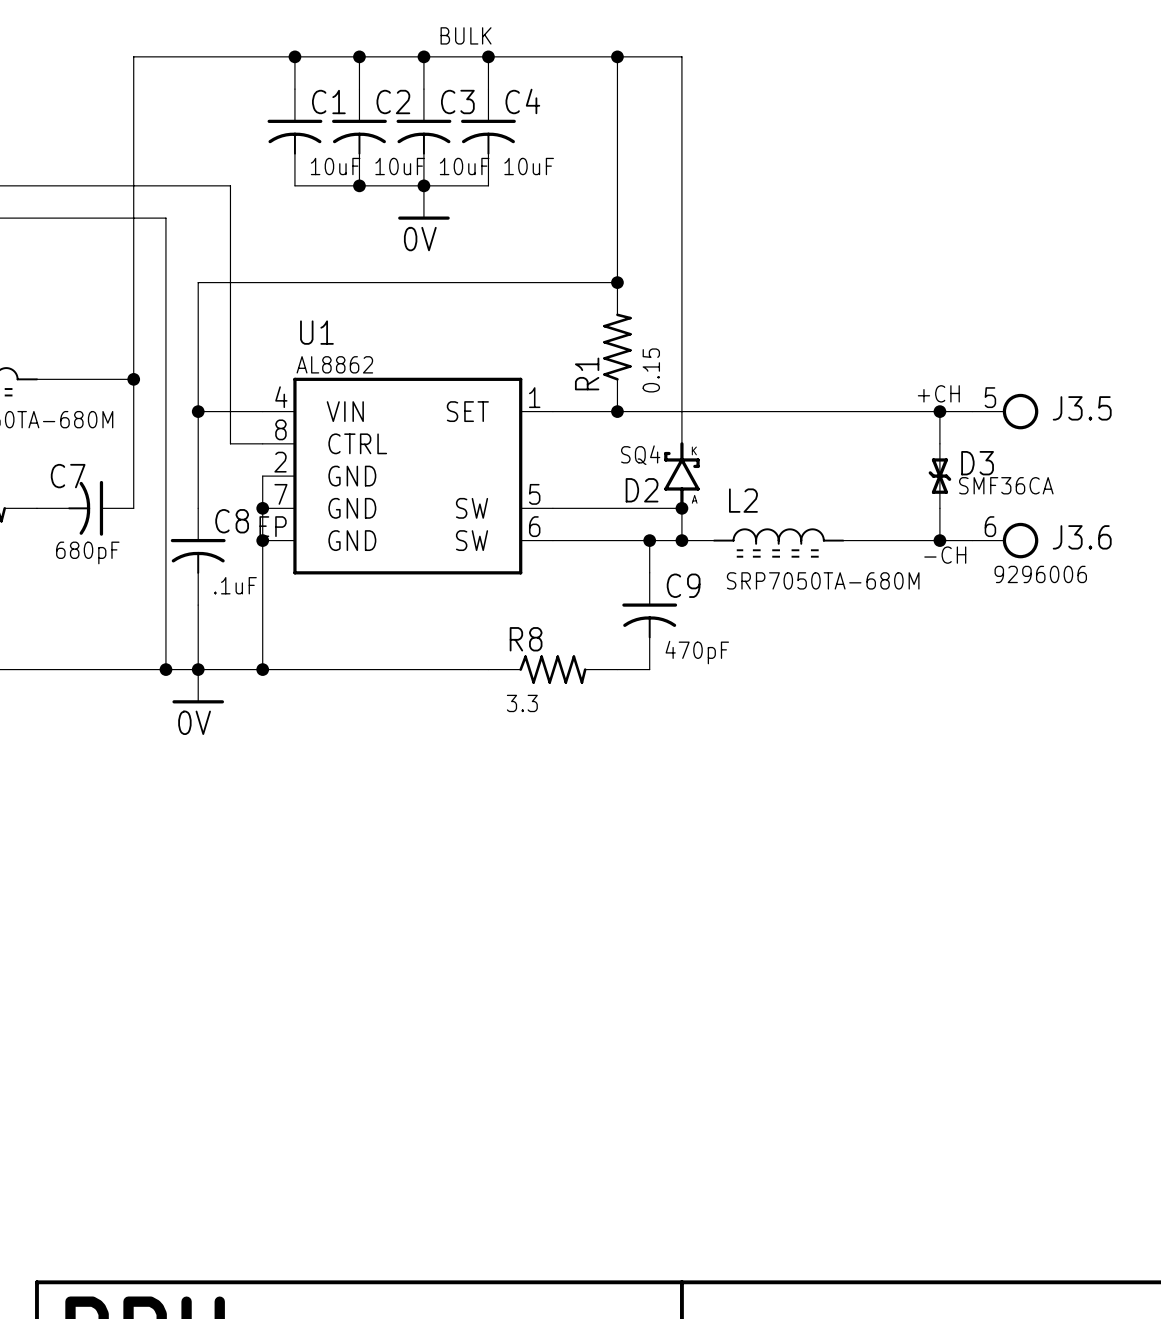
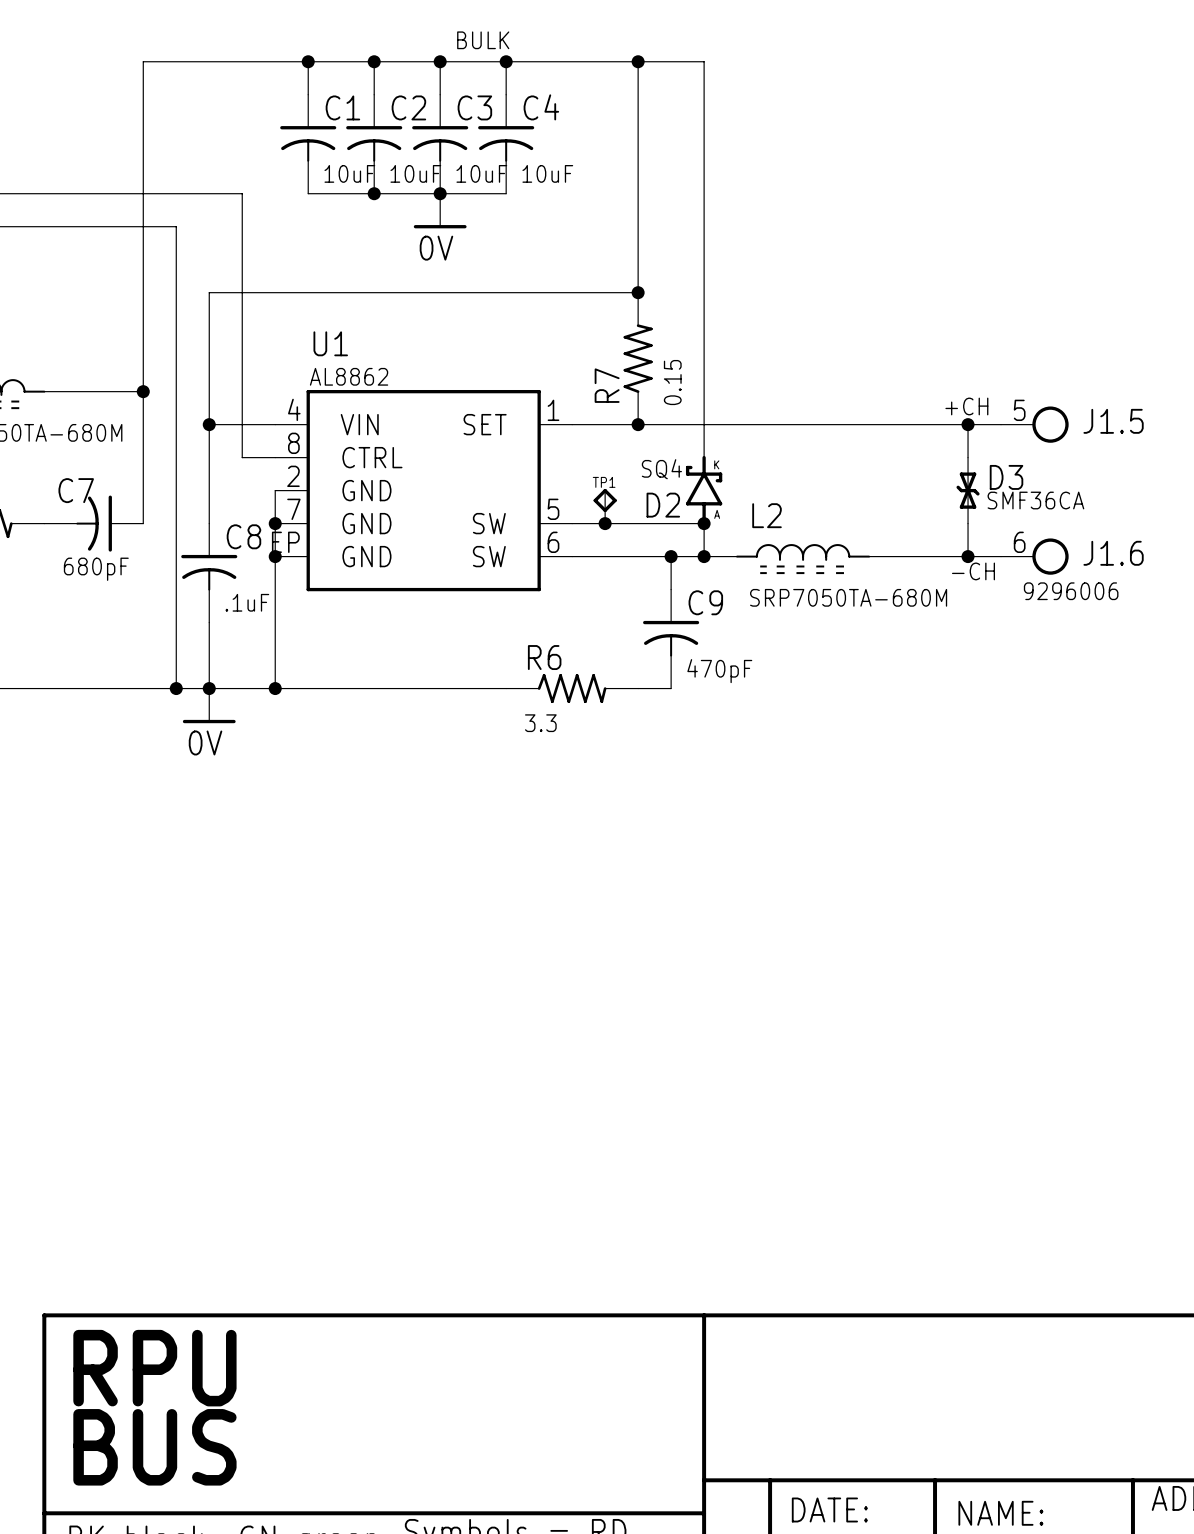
R1 name: R1 (587, 373) -> R7 (607, 385)
J3.5 name: J3.5 (1082, 408) -> J1.5 (1113, 421)
TP1: none -> (605, 506)
junction: none -> (605, 523)
J3.6 name: J3.6 (1082, 537) -> J1.6 (1113, 553)
R8 name: R8 (526, 639) -> R6 (544, 657)

